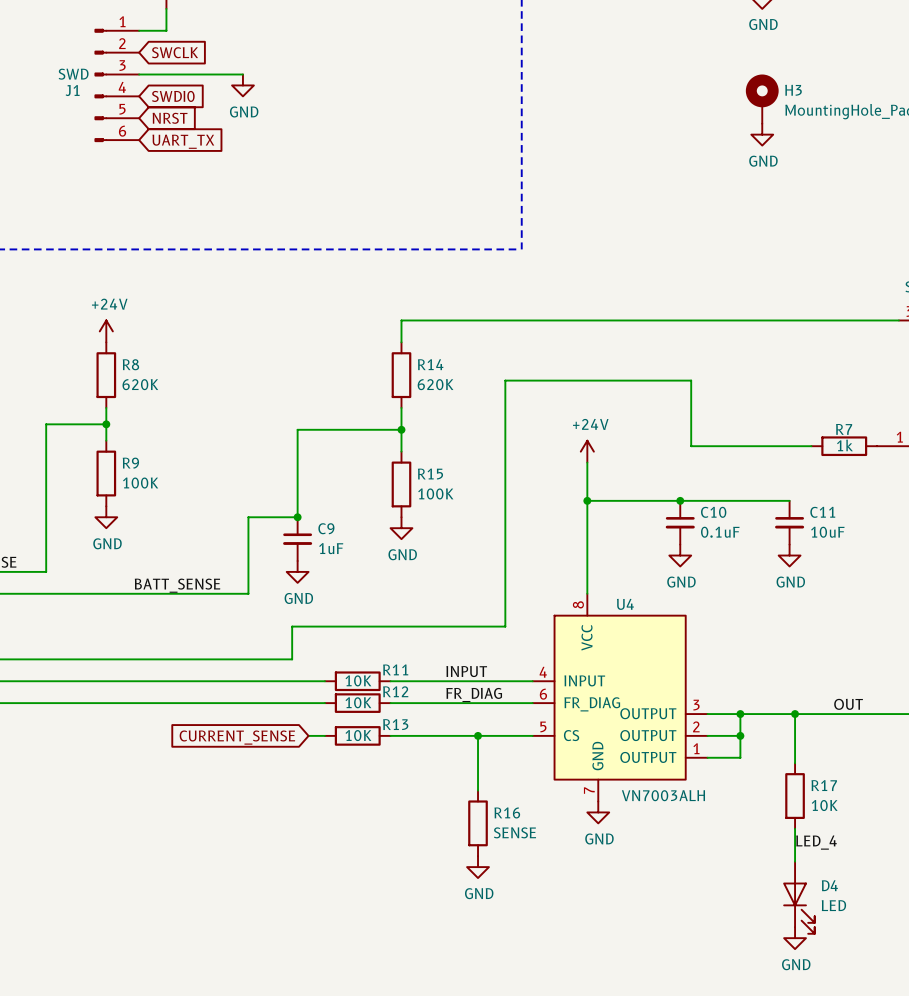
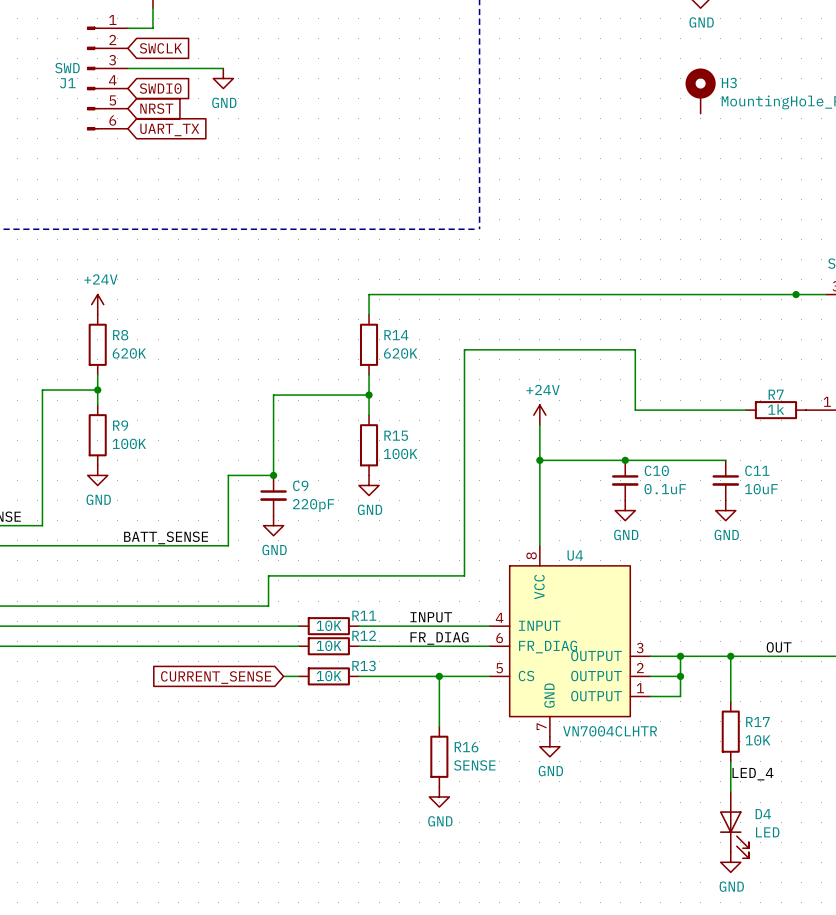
power symbol: GND (762, 134) -> none
junction: none -> (796, 294)
C9 value: 1uF (331, 548) -> 220pF (313, 505)
U4 value: VN7003ALH (663, 795) -> VN7004CLHTR (610, 731)

